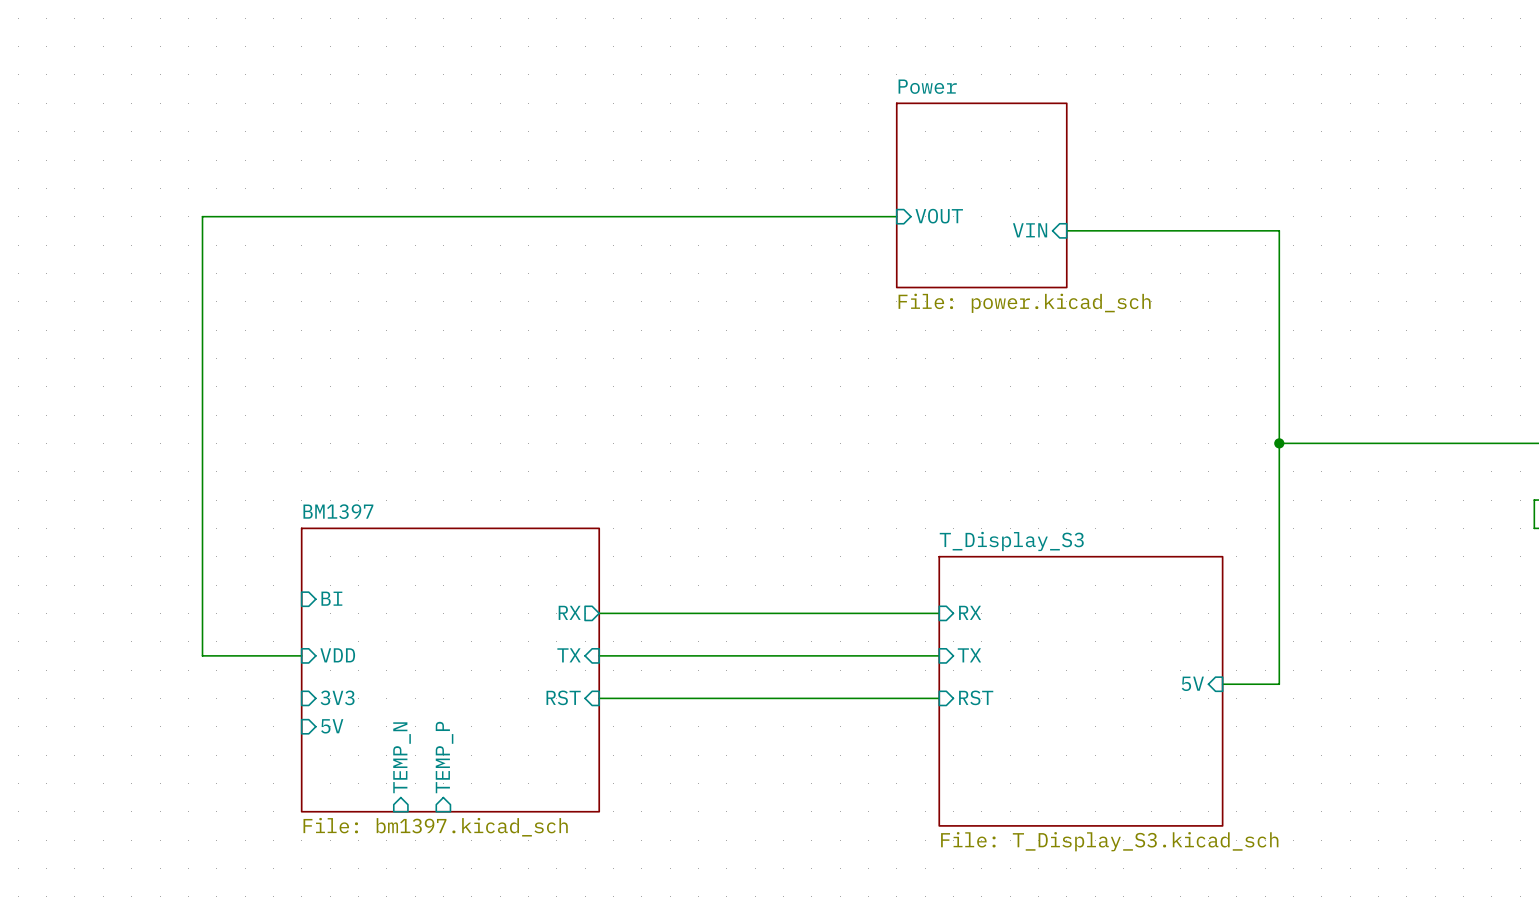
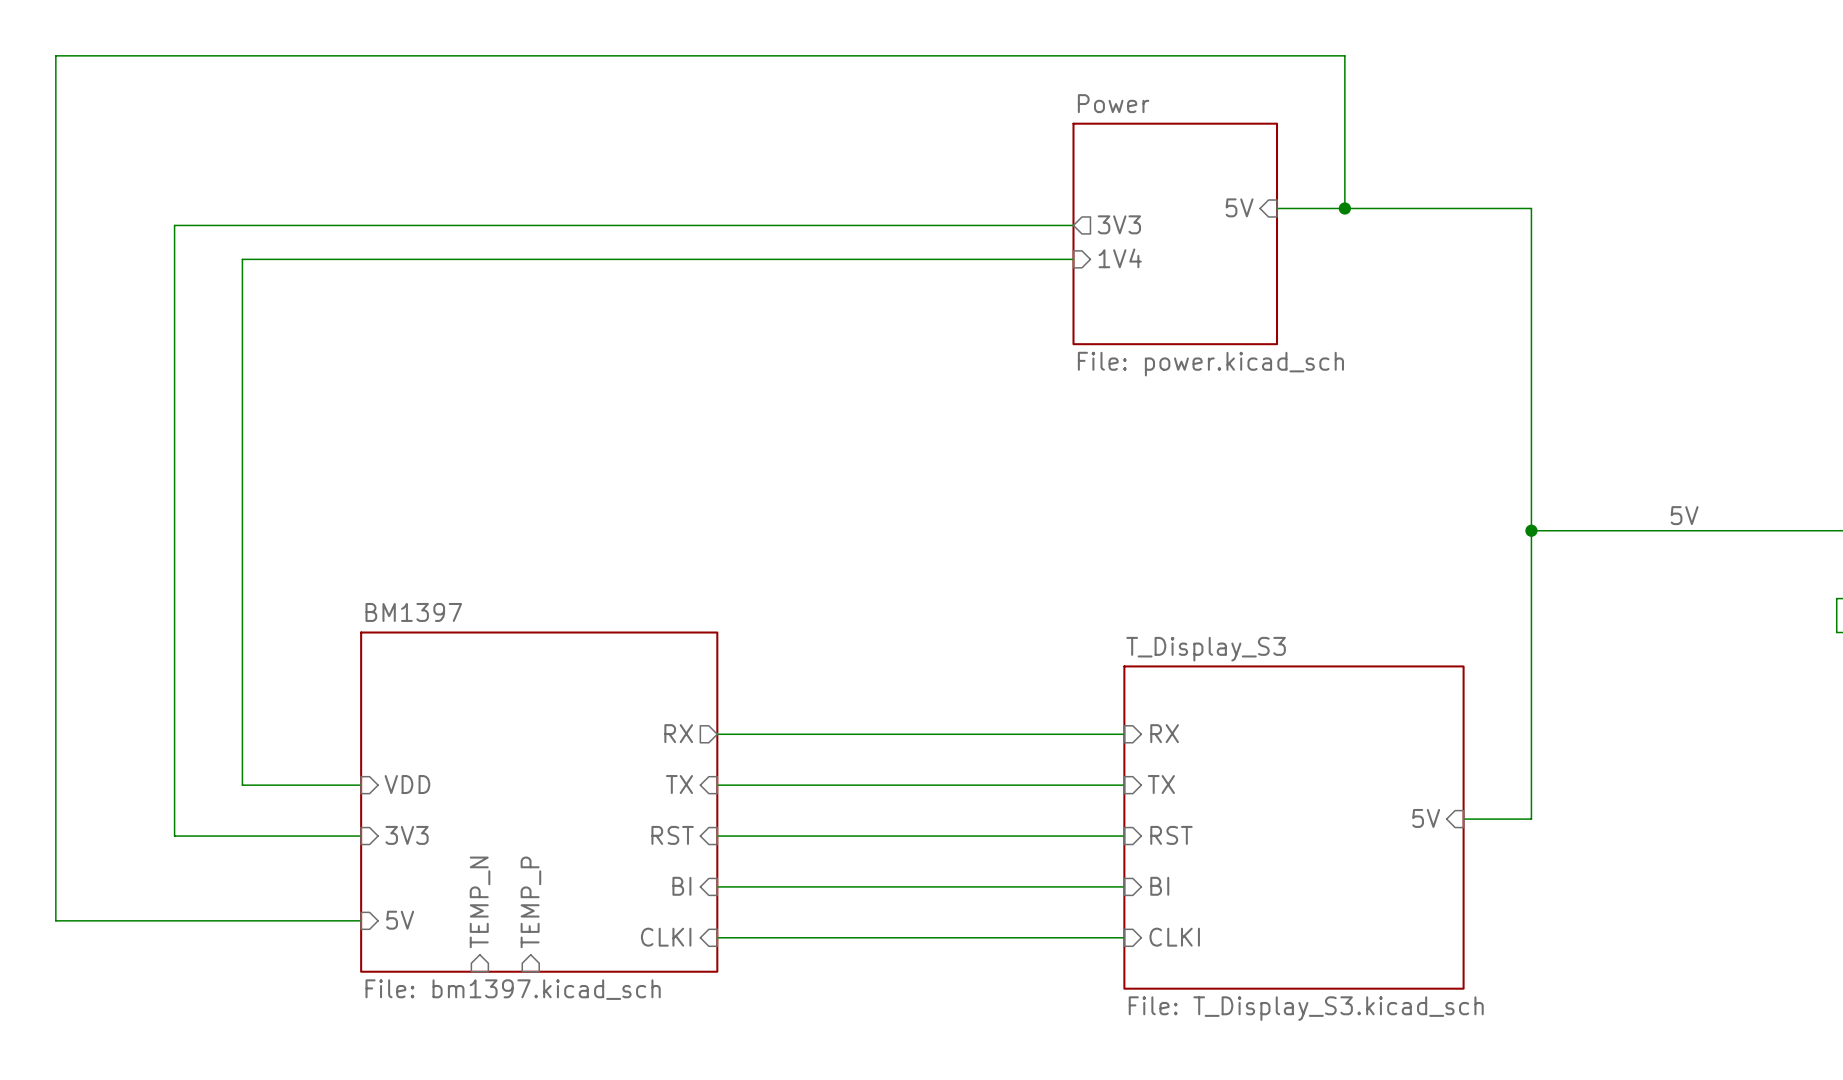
sheet pin: none -> 5V (1239, 207)
wire: none -> (1344, 208) (1344, 55) (55, 55) (55, 920) (361, 920)
junction: none -> (1344, 208)
sheet pin: none -> 3V3 (1119, 224)
wire: none -> (1073, 225) (174, 225) (174, 836) (361, 836)
sheet pin: VOUT (939, 216) -> 1V4 (1120, 258)
sheet pin: VIN (1030, 230) -> none
wire: (1066, 230) (1279, 230) -> (1277, 208) (1531, 208) (1531, 276)
label: none -> 5V (1684, 515)
sheet pin: BI (331, 598) -> none
sheet pin position: 5V (332, 726) -> 5V (400, 920)
sheet pin: none -> BI (681, 886)
wire: none -> (717, 886) (1124, 886)
sheet pin: none -> BI (1159, 886)
sheet pin: none -> CLKI (666, 937)
sheet pin: none -> CLKI (1174, 937)
wire: none -> (717, 937) (1124, 937)

